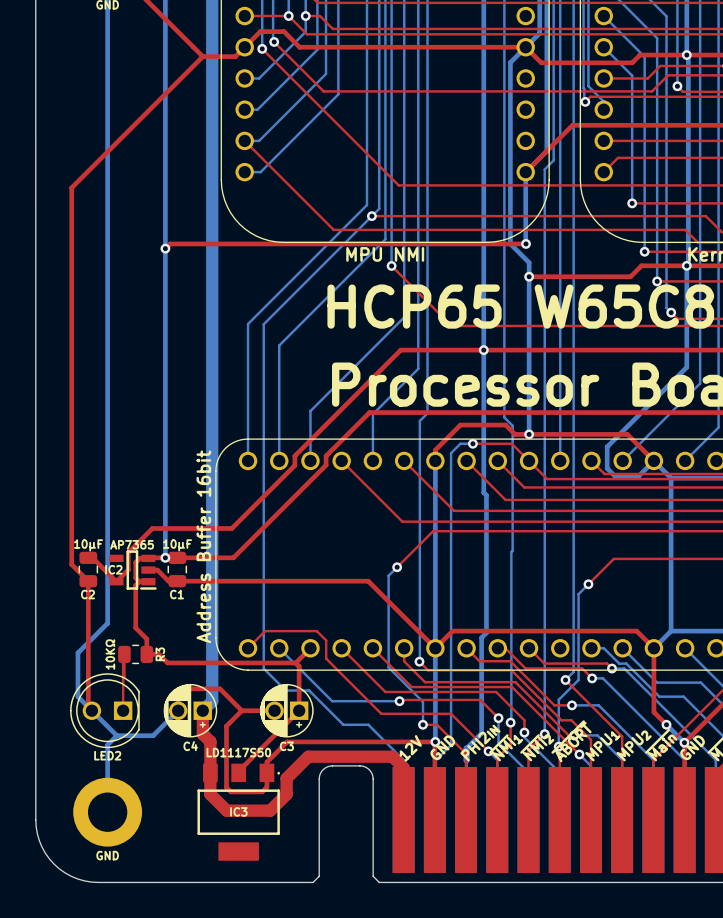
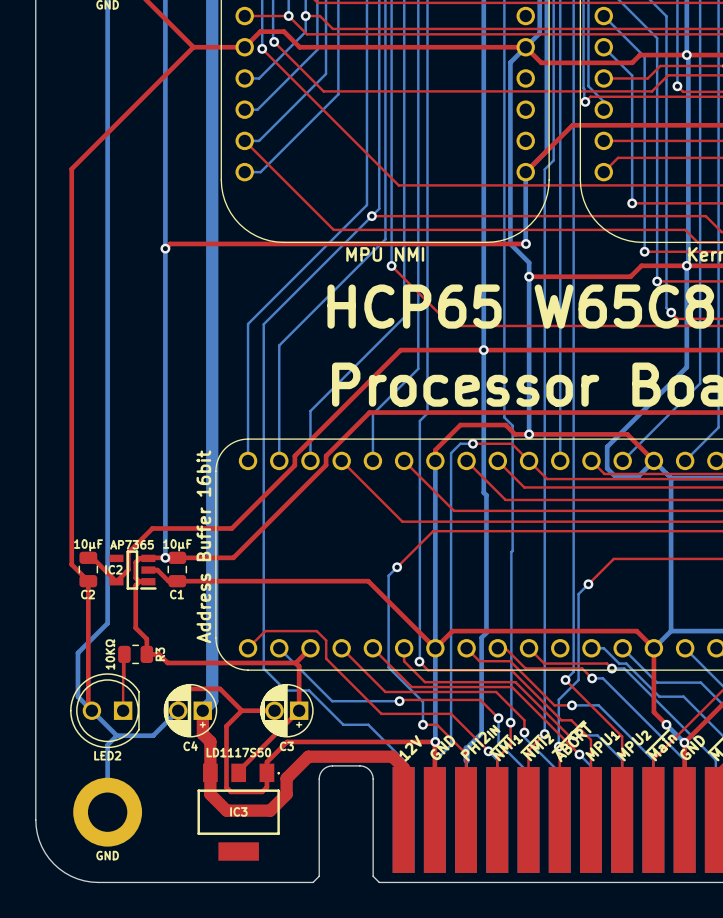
top track: (193, 47) (202, 56) -> none
top track: (244, 47) (235, 56) (202, 56) -> none
top track: (202, 56) (71, 187) -> (244, 47) (193, 47) (71, 169) (71, 187)

